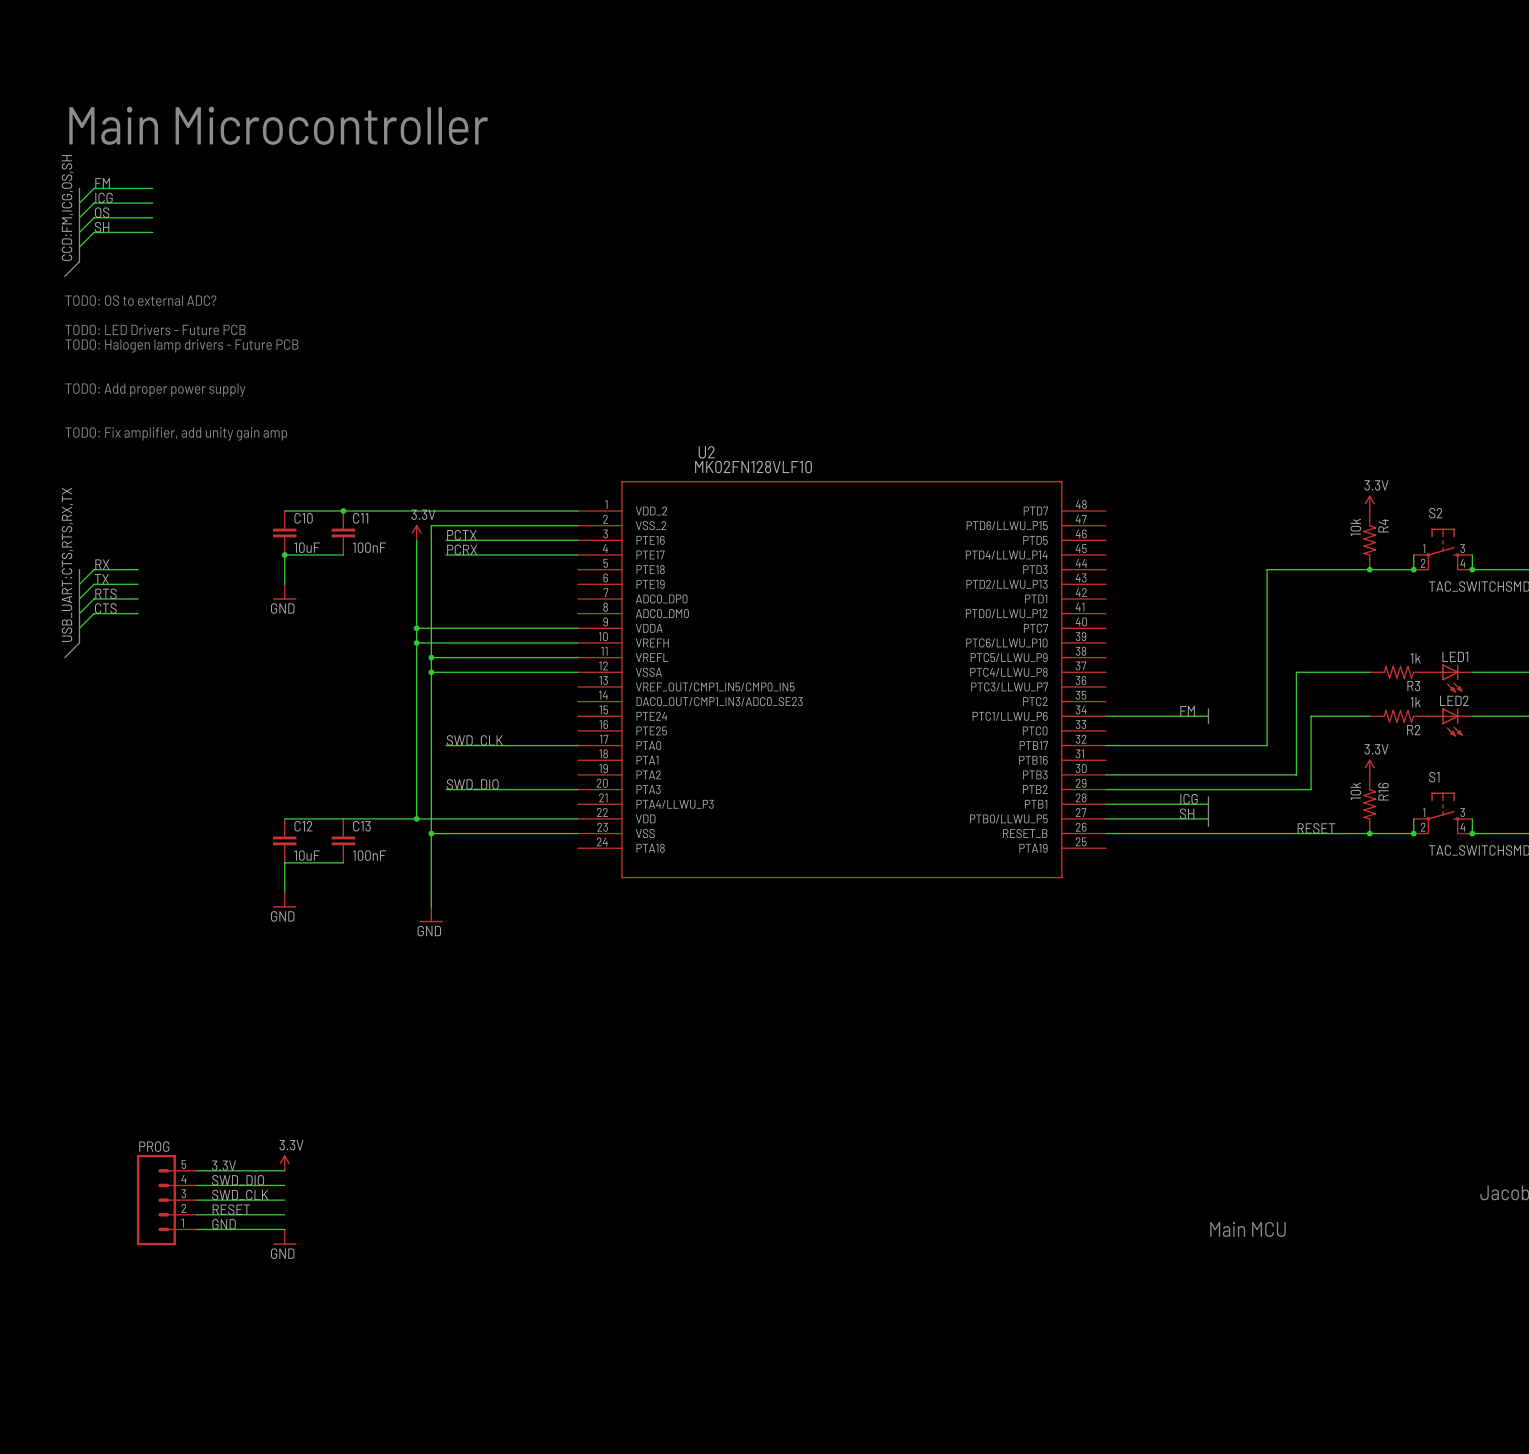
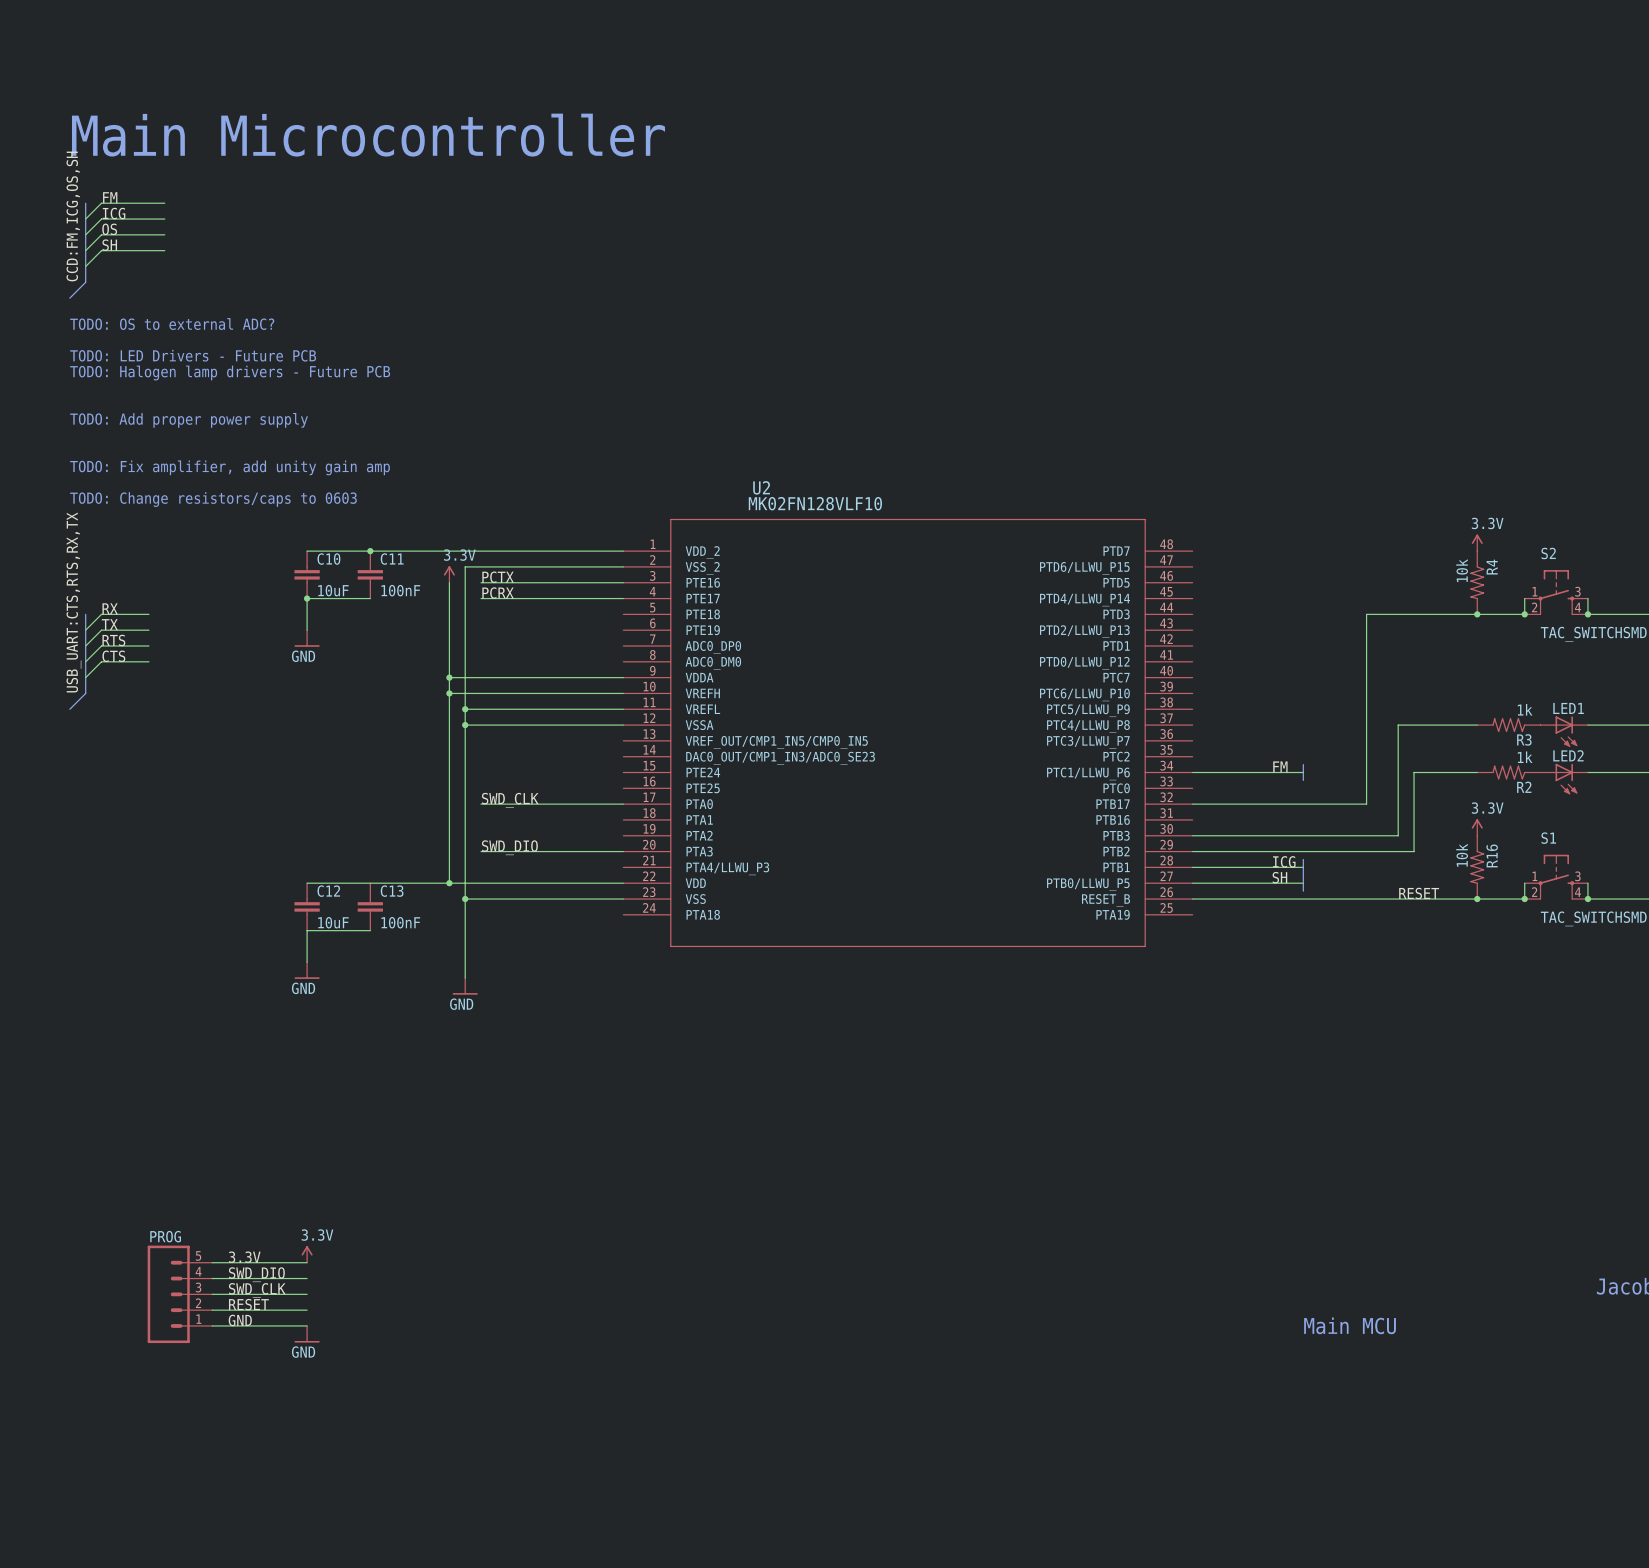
text: none -> TODO: Change resistors/caps to 0603 (213, 499)

